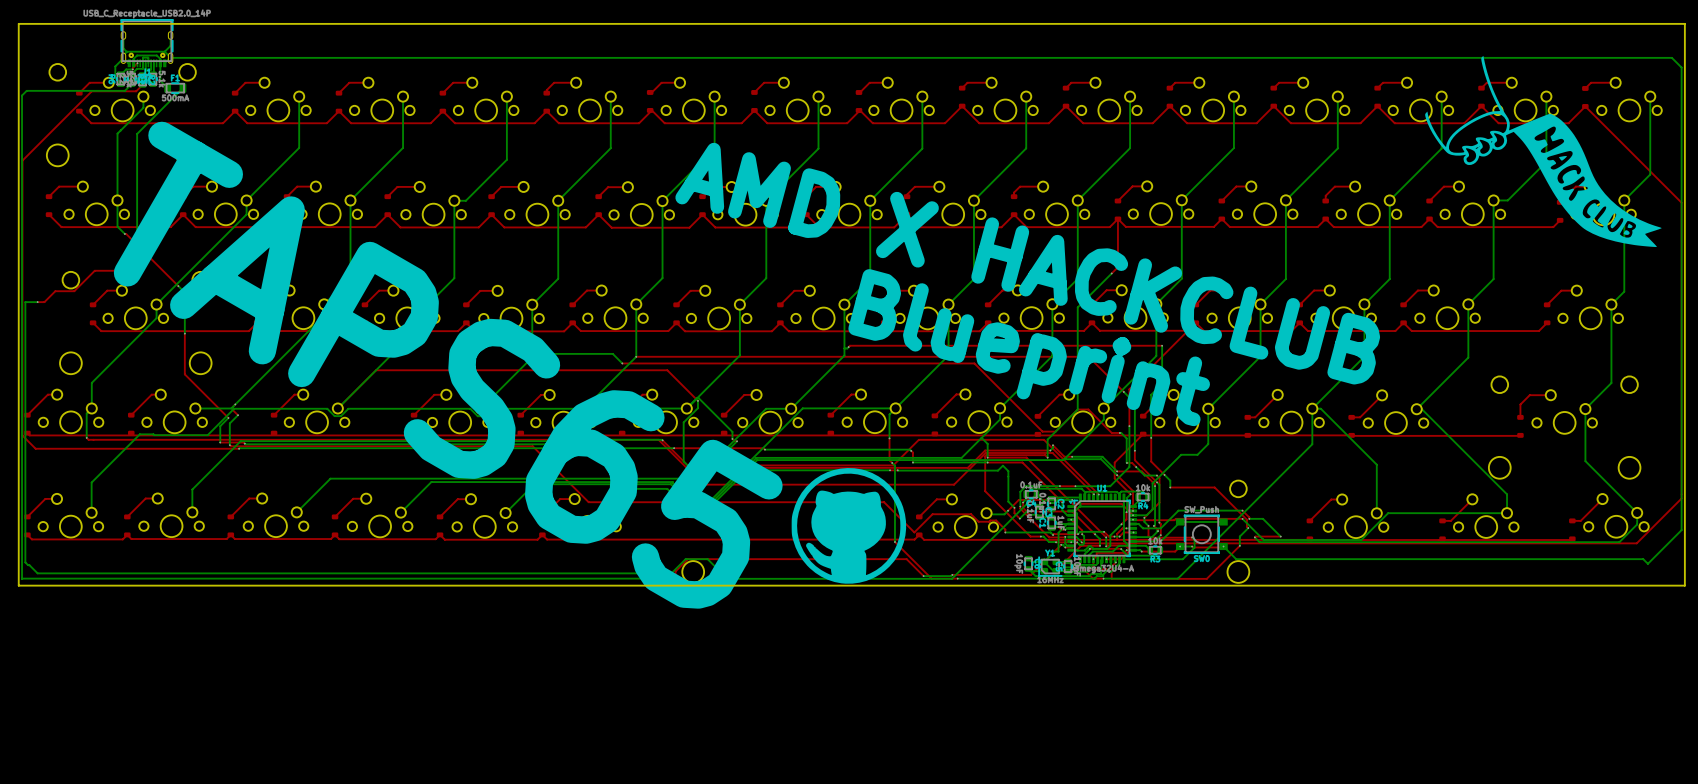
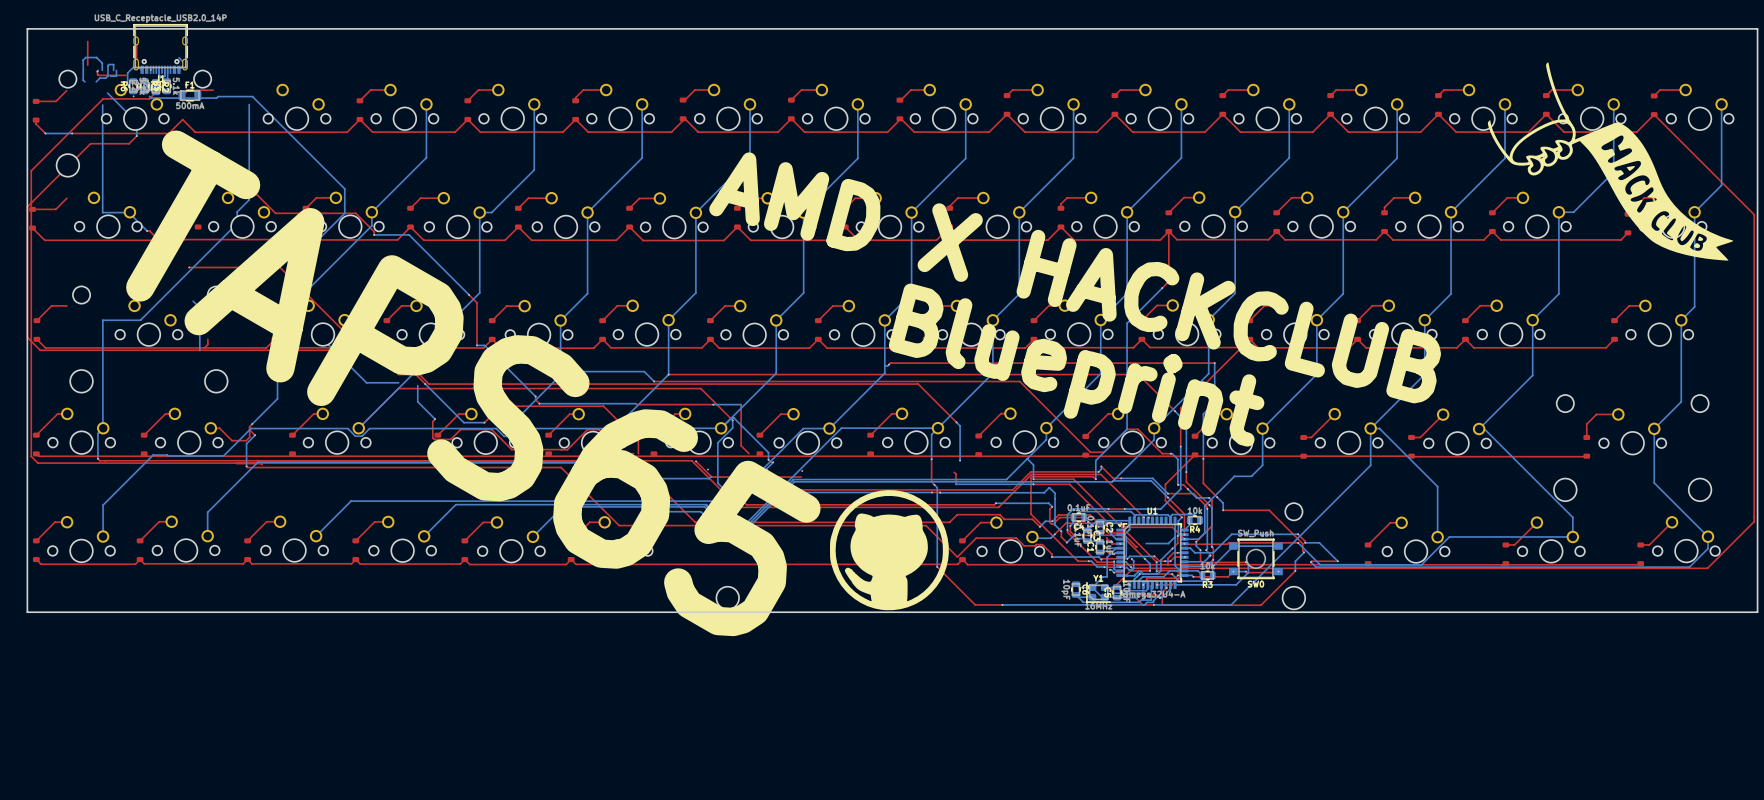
bottom track: (123, 35) (123, 48) (126, 51) -> none
bottom track: (170, 35) (170, 45) (164, 51) (127, 51) (123, 58) -> none
top track: none -> (87, 41) (87, 65)
top track: none -> (136, 41) (136, 65)
bottom track: (170, 58) (1671, 57) (1681, 67) (1681, 530) (1647, 563) (1643, 559) (1236, 559) (1223, 546) -> none
bottom track: none -> (98, 70) (97, 71)
bottom track: none -> (102, 70) (102, 63) (96, 57) (85, 57) (83, 60) (83, 80) (84, 81)
bottom track: none -> (113, 70) (113, 64) (108, 64) (107, 75) (105, 78) (99, 78) (96, 81)
bottom track: none -> (116, 70) (116, 76) (110, 75)
bottom track: (133, 63) (133, 58) (137, 55) (156, 55) (160, 59) (160, 80) (167, 88) -> none
top track: (137, 63) (132, 69) -> none
bottom track: (148, 63) (148, 57) (143, 57) (142, 68) (136, 68) (131, 74) -> none
top track: none -> (97, 71) (98, 75) (126, 75)
via: none -> (97, 71)
bottom track: (132, 69) (126, 69) (121, 74) -> none
via position: (132, 69) -> (133, 96)
top track: (108, 82) (89, 82) (79, 93) -> none
top track: none -> (213, 90) (188, 90) (182, 95) (182, 100)
top track: (264, 82) (245, 82) (235, 93) -> none
top track: none -> (66, 90) (55, 101) (36, 101)
bottom track: (131, 84) (124, 90) (26, 90) (22, 95) (22, 578) (675, 578) -> none
bottom track: none -> (107, 93) (136, 122) (136, 136)
bottom track: none -> (149, 96) (151, 98) (252, 96) (344, 188) (344, 213) (297, 260) (297, 296)
bottom track: (182, 88) (137, 133) (137, 270) -> none
bottom track: (143, 96) (143, 107) (117, 133) (117, 226) (124, 233) -> none
bottom track: (299, 96) (299, 147) (246, 200) (246, 214) (156, 304) (156, 318) (91, 382) (91, 408) -> (249, 104) (249, 199) (237, 211) (237, 223) (140, 320) (102, 320) (103, 428)
bottom track: none -> (102, 104) (102, 212) (128, 212) (147, 230)
part position: (79, 102) -> (36, 110)
part: (235, 102) -> none
top track: none -> (36, 120) (36, 124) (45, 133)
top track: (79, 111) (91, 123) (222, 123) (235, 111) (247, 123) (326, 123) -> (72, 133) (168, 133) (182, 119) (195, 132) (347, 132)
via: none -> (45, 133)
bottom track: none -> (72, 133) (45, 133)
via: none -> (72, 133)
top track: none -> (136, 136) (129, 143) (90, 143) (27, 206) (27, 337) (40, 350) (395, 350) (428, 384) (918, 384) (956, 422)
via: none -> (136, 136)
top track: none -> (242, 180) (275, 213) (355, 213) (374, 231) (374, 234)
top track: none -> (66, 198) (55, 209) (32, 209)
top track: (82, 186) (59, 186) (49, 196) -> none
top track: (211, 186) (193, 186) (183, 196) -> none
part position: (49, 205) -> (32, 218)
bottom track: (350, 213) (350, 278) (324, 304) (324, 315) (259, 380) -> (371, 225) (277, 320) (277, 398)
top track: (49, 214) (61, 227) (170, 227) (183, 214) (195, 227) (274, 226) -> (32, 228) (44, 240) (157, 240) (171, 226) (184, 239) (293, 239)
top track: none -> (147, 230) (155, 237)
bottom track: none -> (374, 234) (409, 234) (469, 294)
via: none -> (374, 234)
top track: (124, 233) (178, 286) -> none
via position: (124, 233) -> (147, 230)
top track: none -> (189, 267) (280, 267) (357, 345)
via: none -> (189, 267)
top track: (137, 270) (94, 270) (74, 291) (55, 291) (44, 302) (37, 302) -> none
top track: none -> (469, 294) (476, 302) (476, 345)
via: none -> (469, 294)
via: (178, 286) -> none
top track: (121, 290) (107, 290) (93, 304) -> (66, 305) (51, 305) (36, 320)
bottom track: (37, 302) (25, 302) (25, 562) (37, 573) (671, 573) (685, 559) (707, 559) (727, 578) (951, 578) (1036, 494) -> none
via: (37, 302) -> none
part: none -> (36, 329)
part: (93, 313) -> none
top track: (93, 322) (101, 331) -> (36, 339) (45, 347) (113, 347)
top track: none -> (207, 339) (207, 344) (204, 347)
bottom track: none -> (328, 344) (366, 382) (398, 382)
bottom track: none -> (476, 345) (484, 345) (535, 396)
via: none -> (476, 345)
top track: (184, 333) (184, 374) (228, 417) -> none
via: (184, 333) -> none
top track: none -> (398, 374) (415, 374) (425, 383)
bottom track: none -> (425, 383) (463, 422) (484, 422)
via: none -> (425, 383)
bottom track: none -> (417, 385) (417, 401) (435, 419)
top track: none -> (535, 396) (535, 399) (539, 403)
via: none -> (535, 396)
via: none -> (539, 403)
top track: none -> (635, 403) (713, 404)
bottom track: none -> (635, 403) (539, 403)
bottom track: none -> (713, 404) (741, 404)
via: none -> (713, 404)
top track: none -> (741, 404) (741, 445) (749, 453)
top track: none -> (435, 419) (432, 421) (432, 437) (434, 439) (450, 439) (460, 429) (491, 429) (511, 449) (567, 449) (587, 429) (598, 429) (622, 453) (633, 453)
via: none -> (435, 419)
bottom track: none -> (956, 422) (960, 425) (960, 460)
via: none -> (956, 422)
top track: none -> (484, 422) (500, 406) (603, 406) (638, 441) (638, 453)
via: none -> (484, 422)
bottom track: (235, 404) (231, 408) (195, 408) -> none
top track: none -> (210, 428) (219, 428) (232, 440) (246, 440) (249, 437) (249, 429)
bottom track: (228, 417) (220, 426) (220, 442) -> none
via: (228, 417) -> none
via: none -> (960, 460)
bottom track: (662, 440) (567, 439) (563, 444) (244, 443) -> none
top track: (28, 442) (35, 448) (239, 448) -> (37, 463) (641, 463) (656, 478)
via: (220, 442) -> none
via: (244, 443) -> none
top track: none -> (638, 465) (695, 522) (949, 522) (957, 514) (999, 514) (1004, 519) (1032, 519) (1039, 526)
via: (239, 448) -> none
top track: (674, 448) (764, 449) -> none
bottom track: (674, 448) (239, 448) -> none
bottom track: (764, 449) (911, 450) -> none
via: (911, 450) -> none
bottom track: none -> (711, 476) (709, 478) (656, 478)
top track: (677, 455) (687, 465) (893, 465) (918, 439) (1044, 439) (1098, 494) -> (711, 477) (801, 477)
top track: none -> (734, 492) (746, 504) (994, 504) (995, 503)
bottom track: none -> (995, 503) (1048, 503) (1052, 506)
via: none -> (995, 503)
top track: none -> (1052, 506) (1049, 509) (1051, 523) (1059, 517) (1084, 517)
via: none -> (1052, 506)
top track: none -> (1052, 521) (1058, 514) (1090, 514) (1108, 532) (1122, 532) (1137, 546)
bottom track: none -> (1052, 521) (1045, 521) (1039, 526)
via: none -> (1052, 521)
via: none -> (1039, 526)
bottom track: (1123, 506) (1079, 506) -> none
top track: none -> (1106, 537) (1112, 543) (1119, 543)
bottom track: none -> (1175, 536) (1168, 543) (1146, 543)
top track: (1071, 519) (1082, 530) (1082, 534) -> none
top track: (1061, 544) (1031, 574) (952, 574) -> none
bottom track: (952, 574) (923, 576) -> none
via: (952, 574) -> none
top track: (923, 576) (906, 559) (687, 559) (675, 571) (675, 578) -> none
via: (923, 576) -> none

